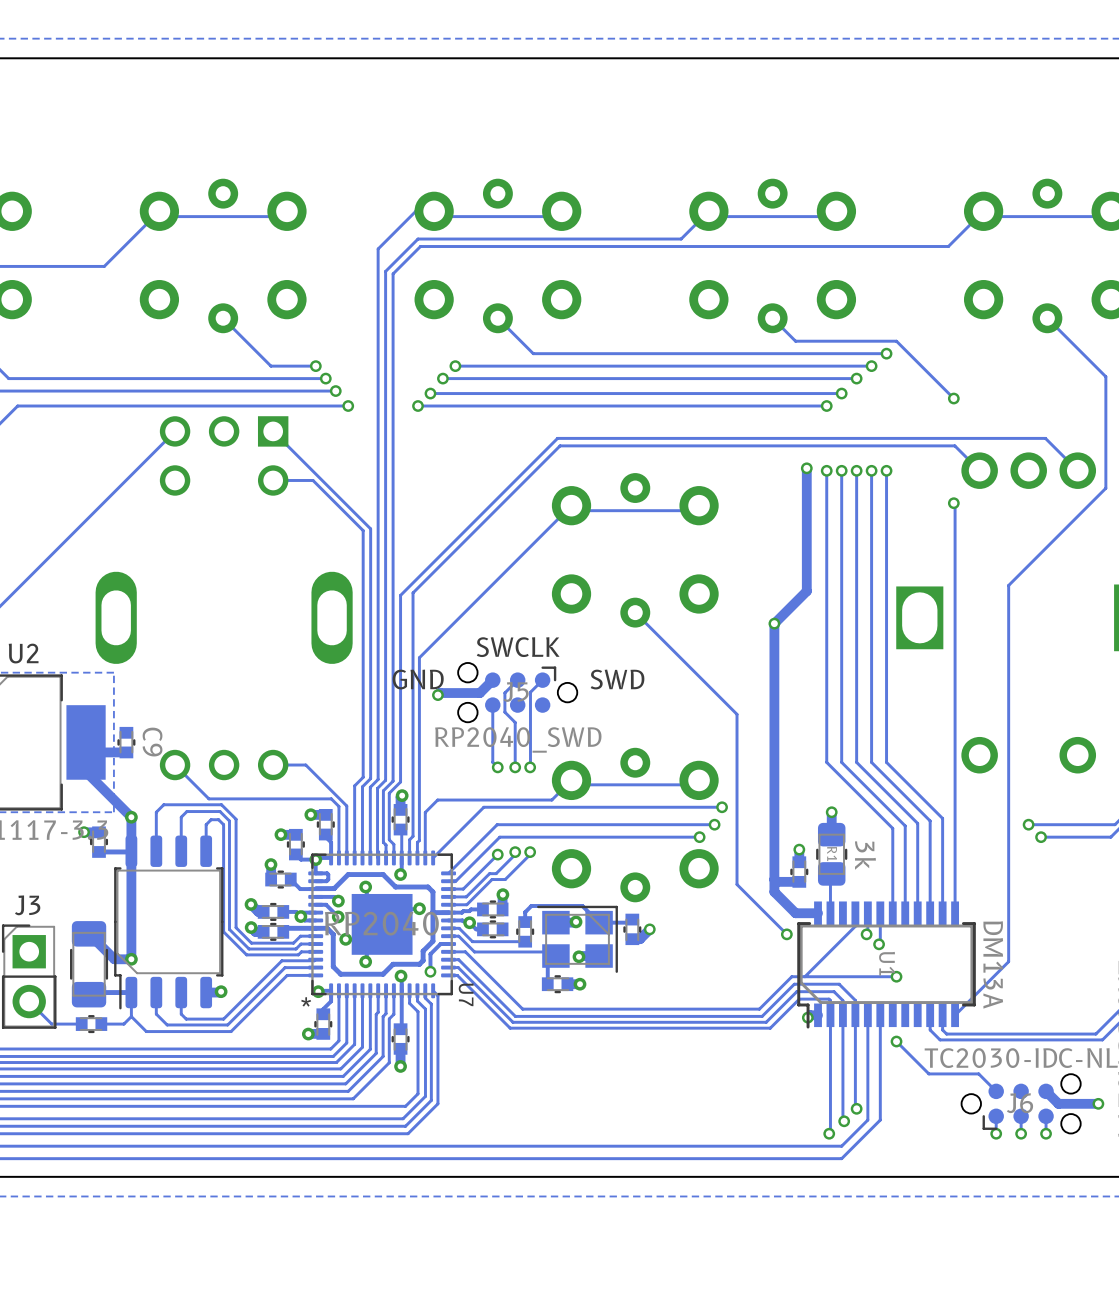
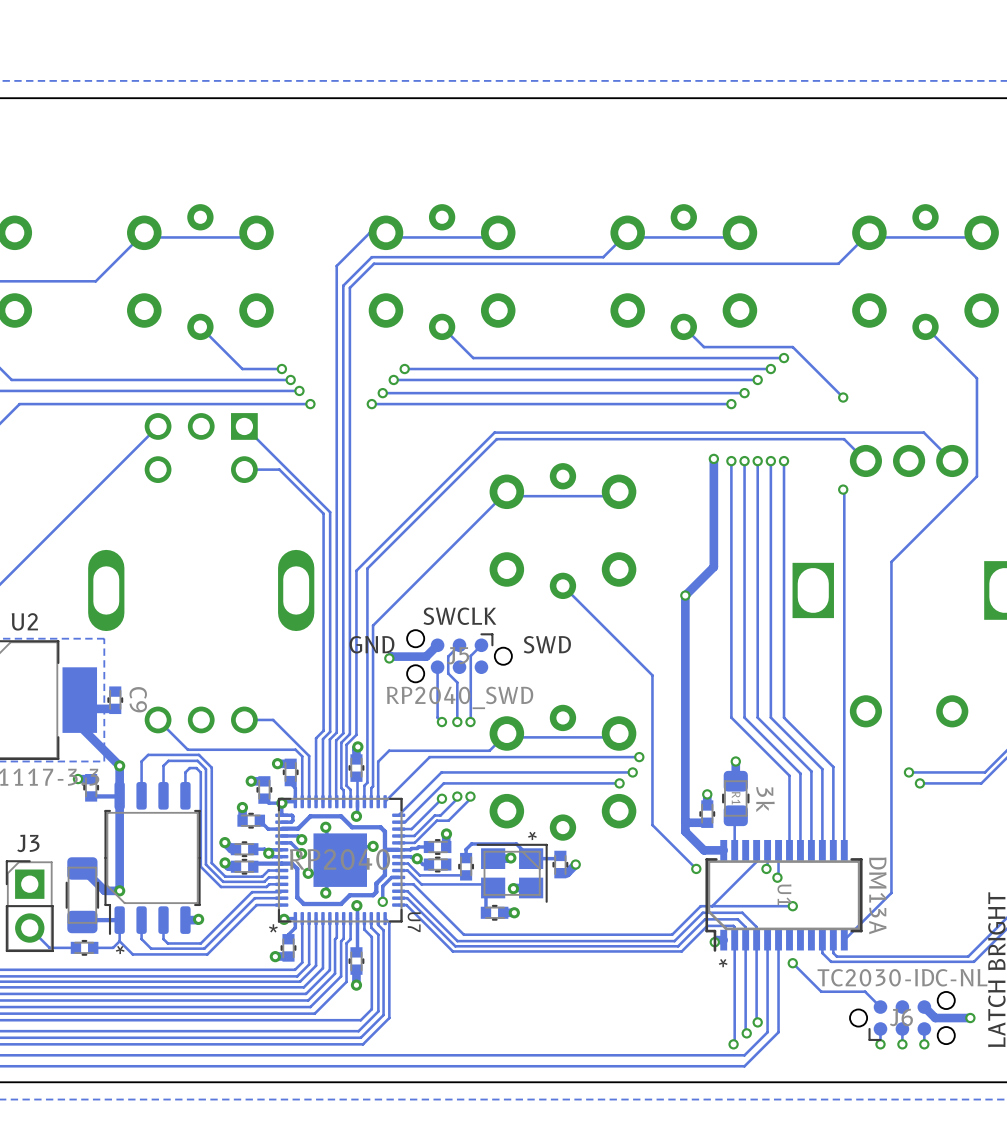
text: none -> * (532, 835)
text: none -> * (120, 949)
text: none -> * (723, 963)

